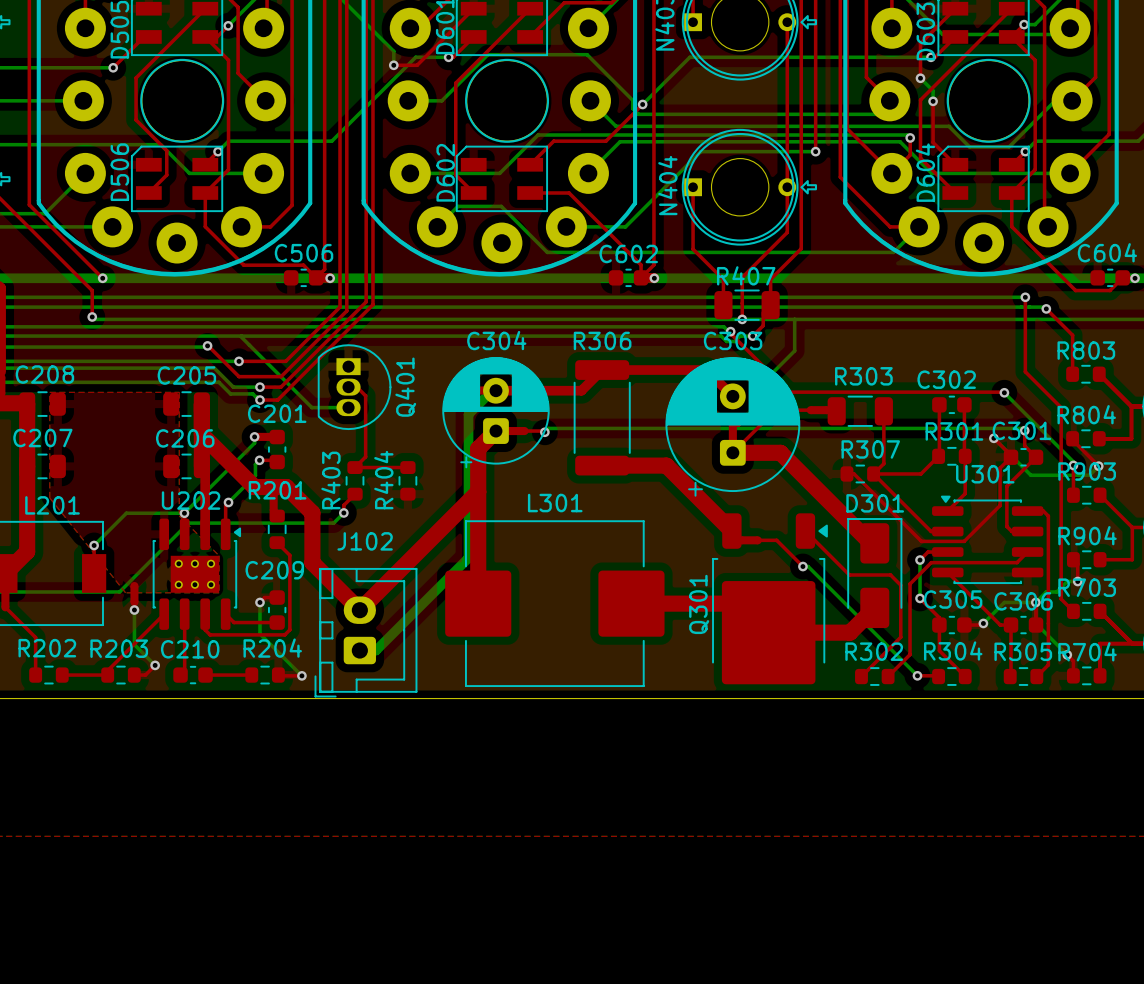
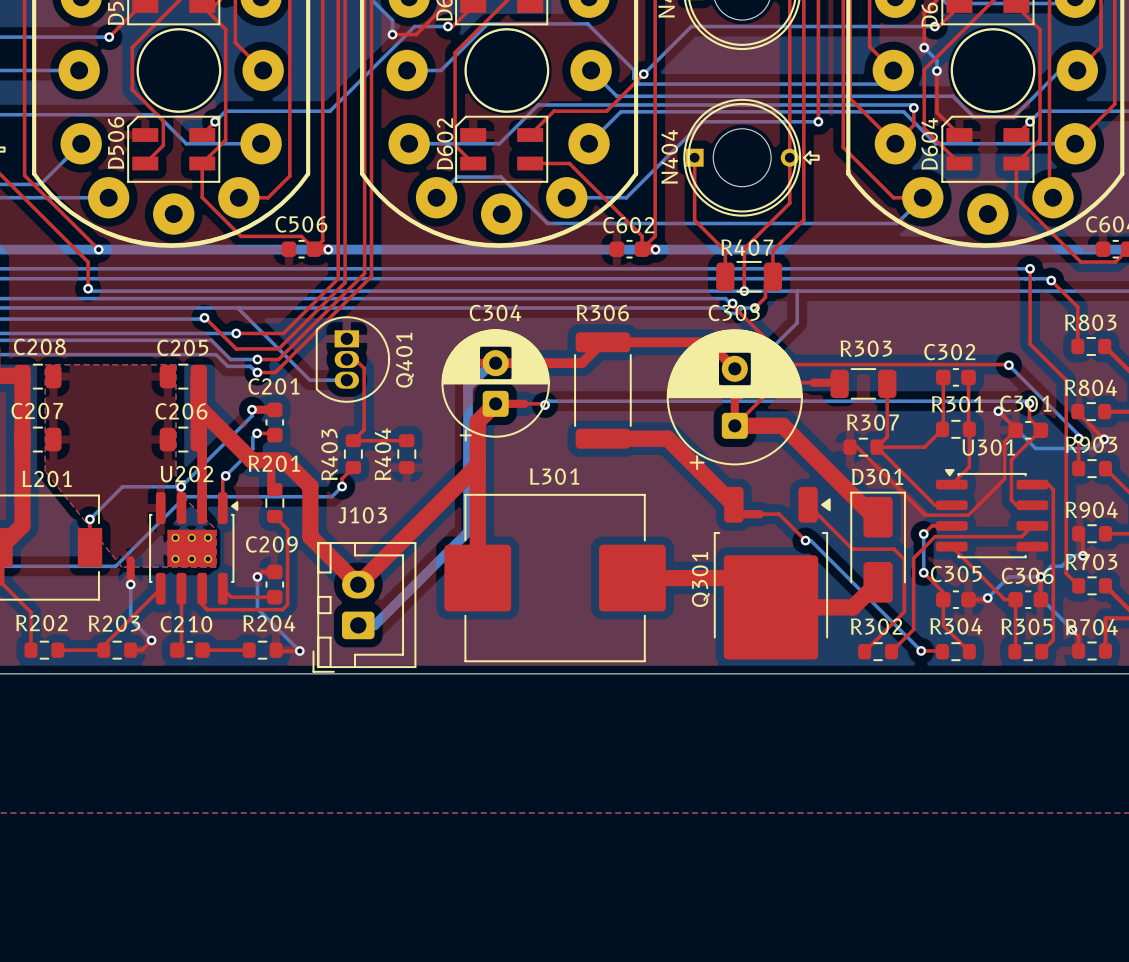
J102 name: J102 (365, 541) -> J103 (362, 515)

